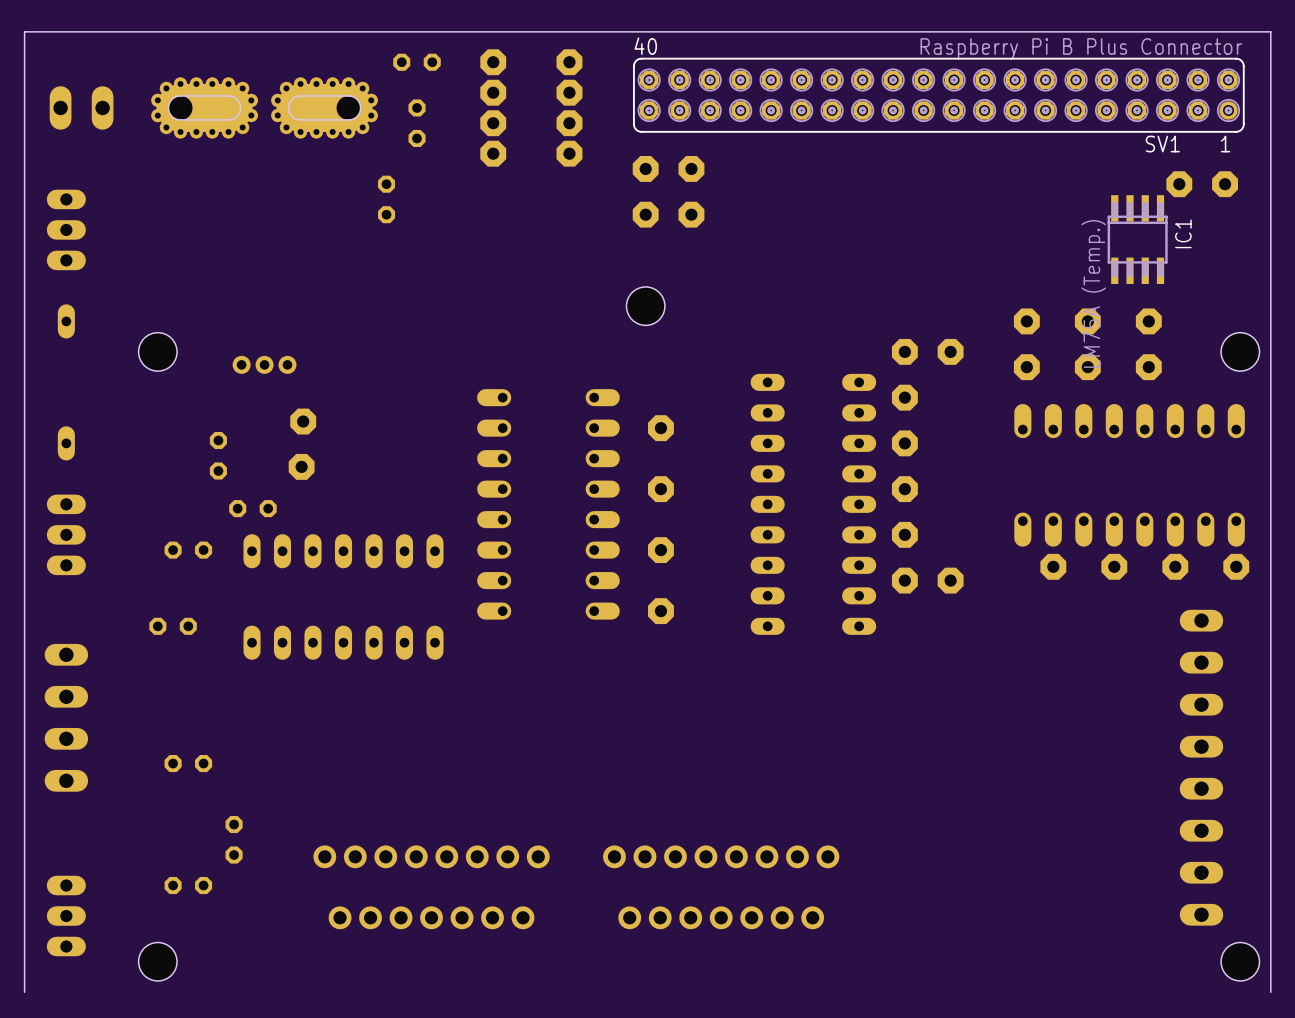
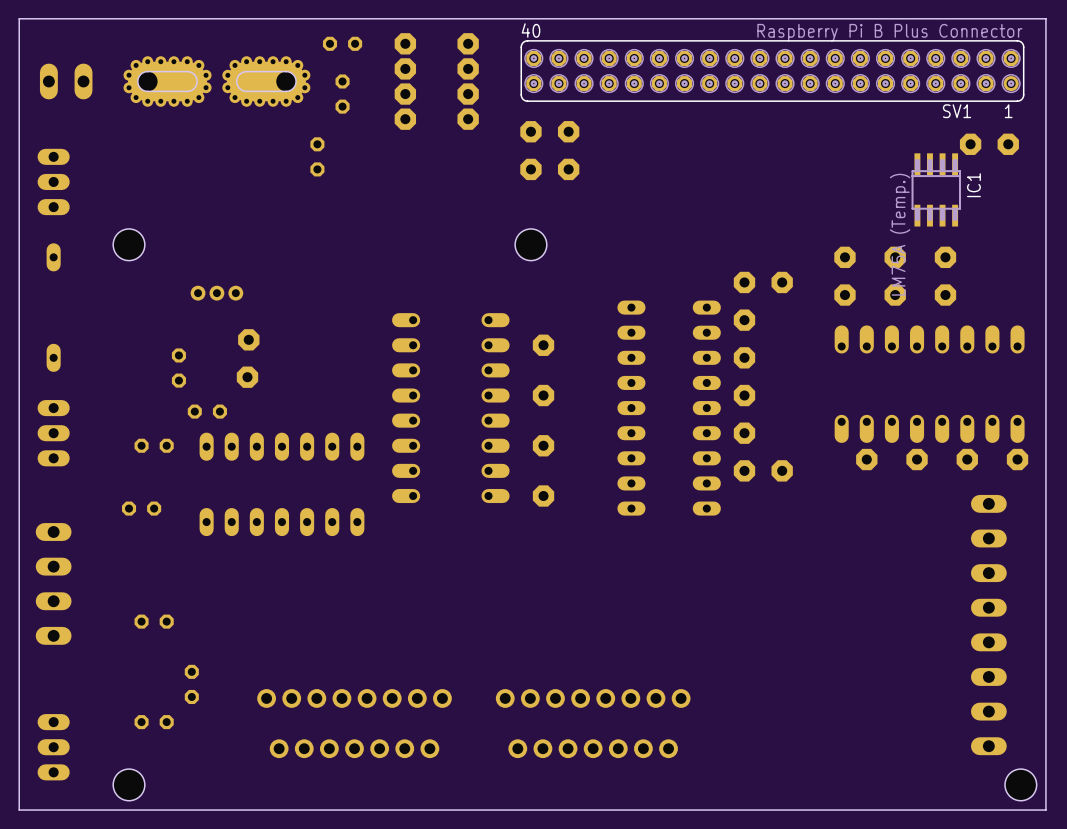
hole position: (157, 351) -> (129, 244)
hole: (1240, 351) -> none
board edge: none -> (1045, 810) (19, 810)

